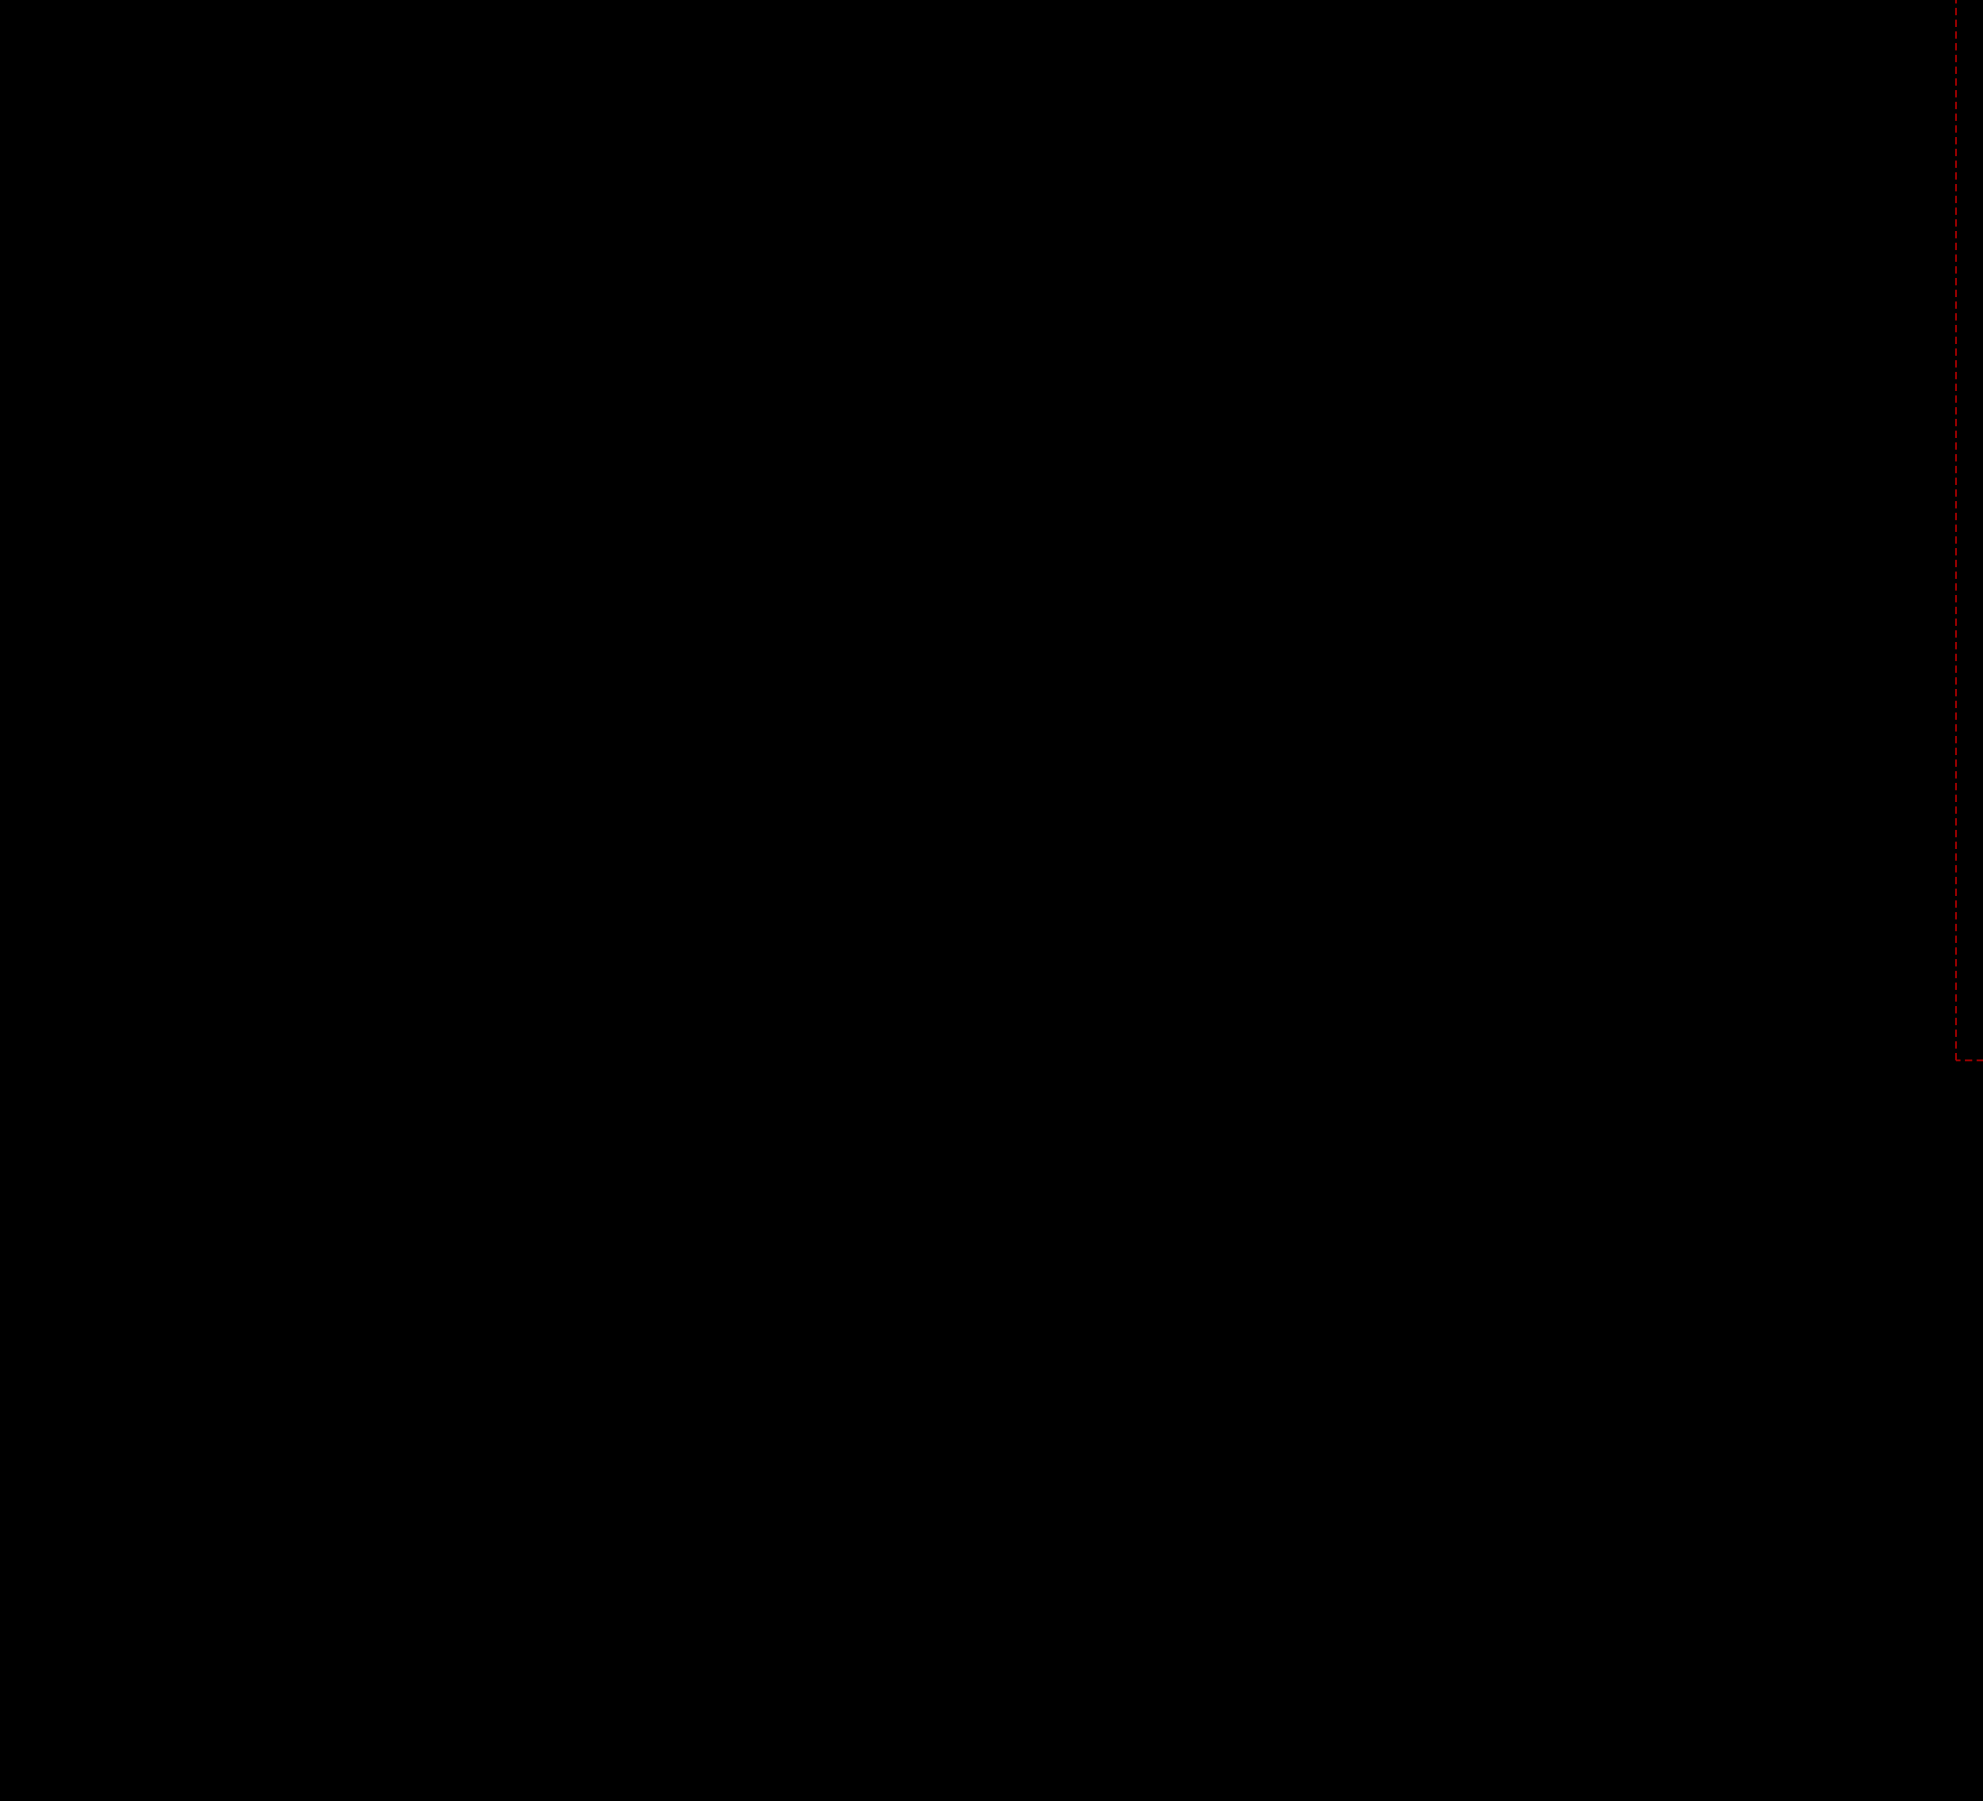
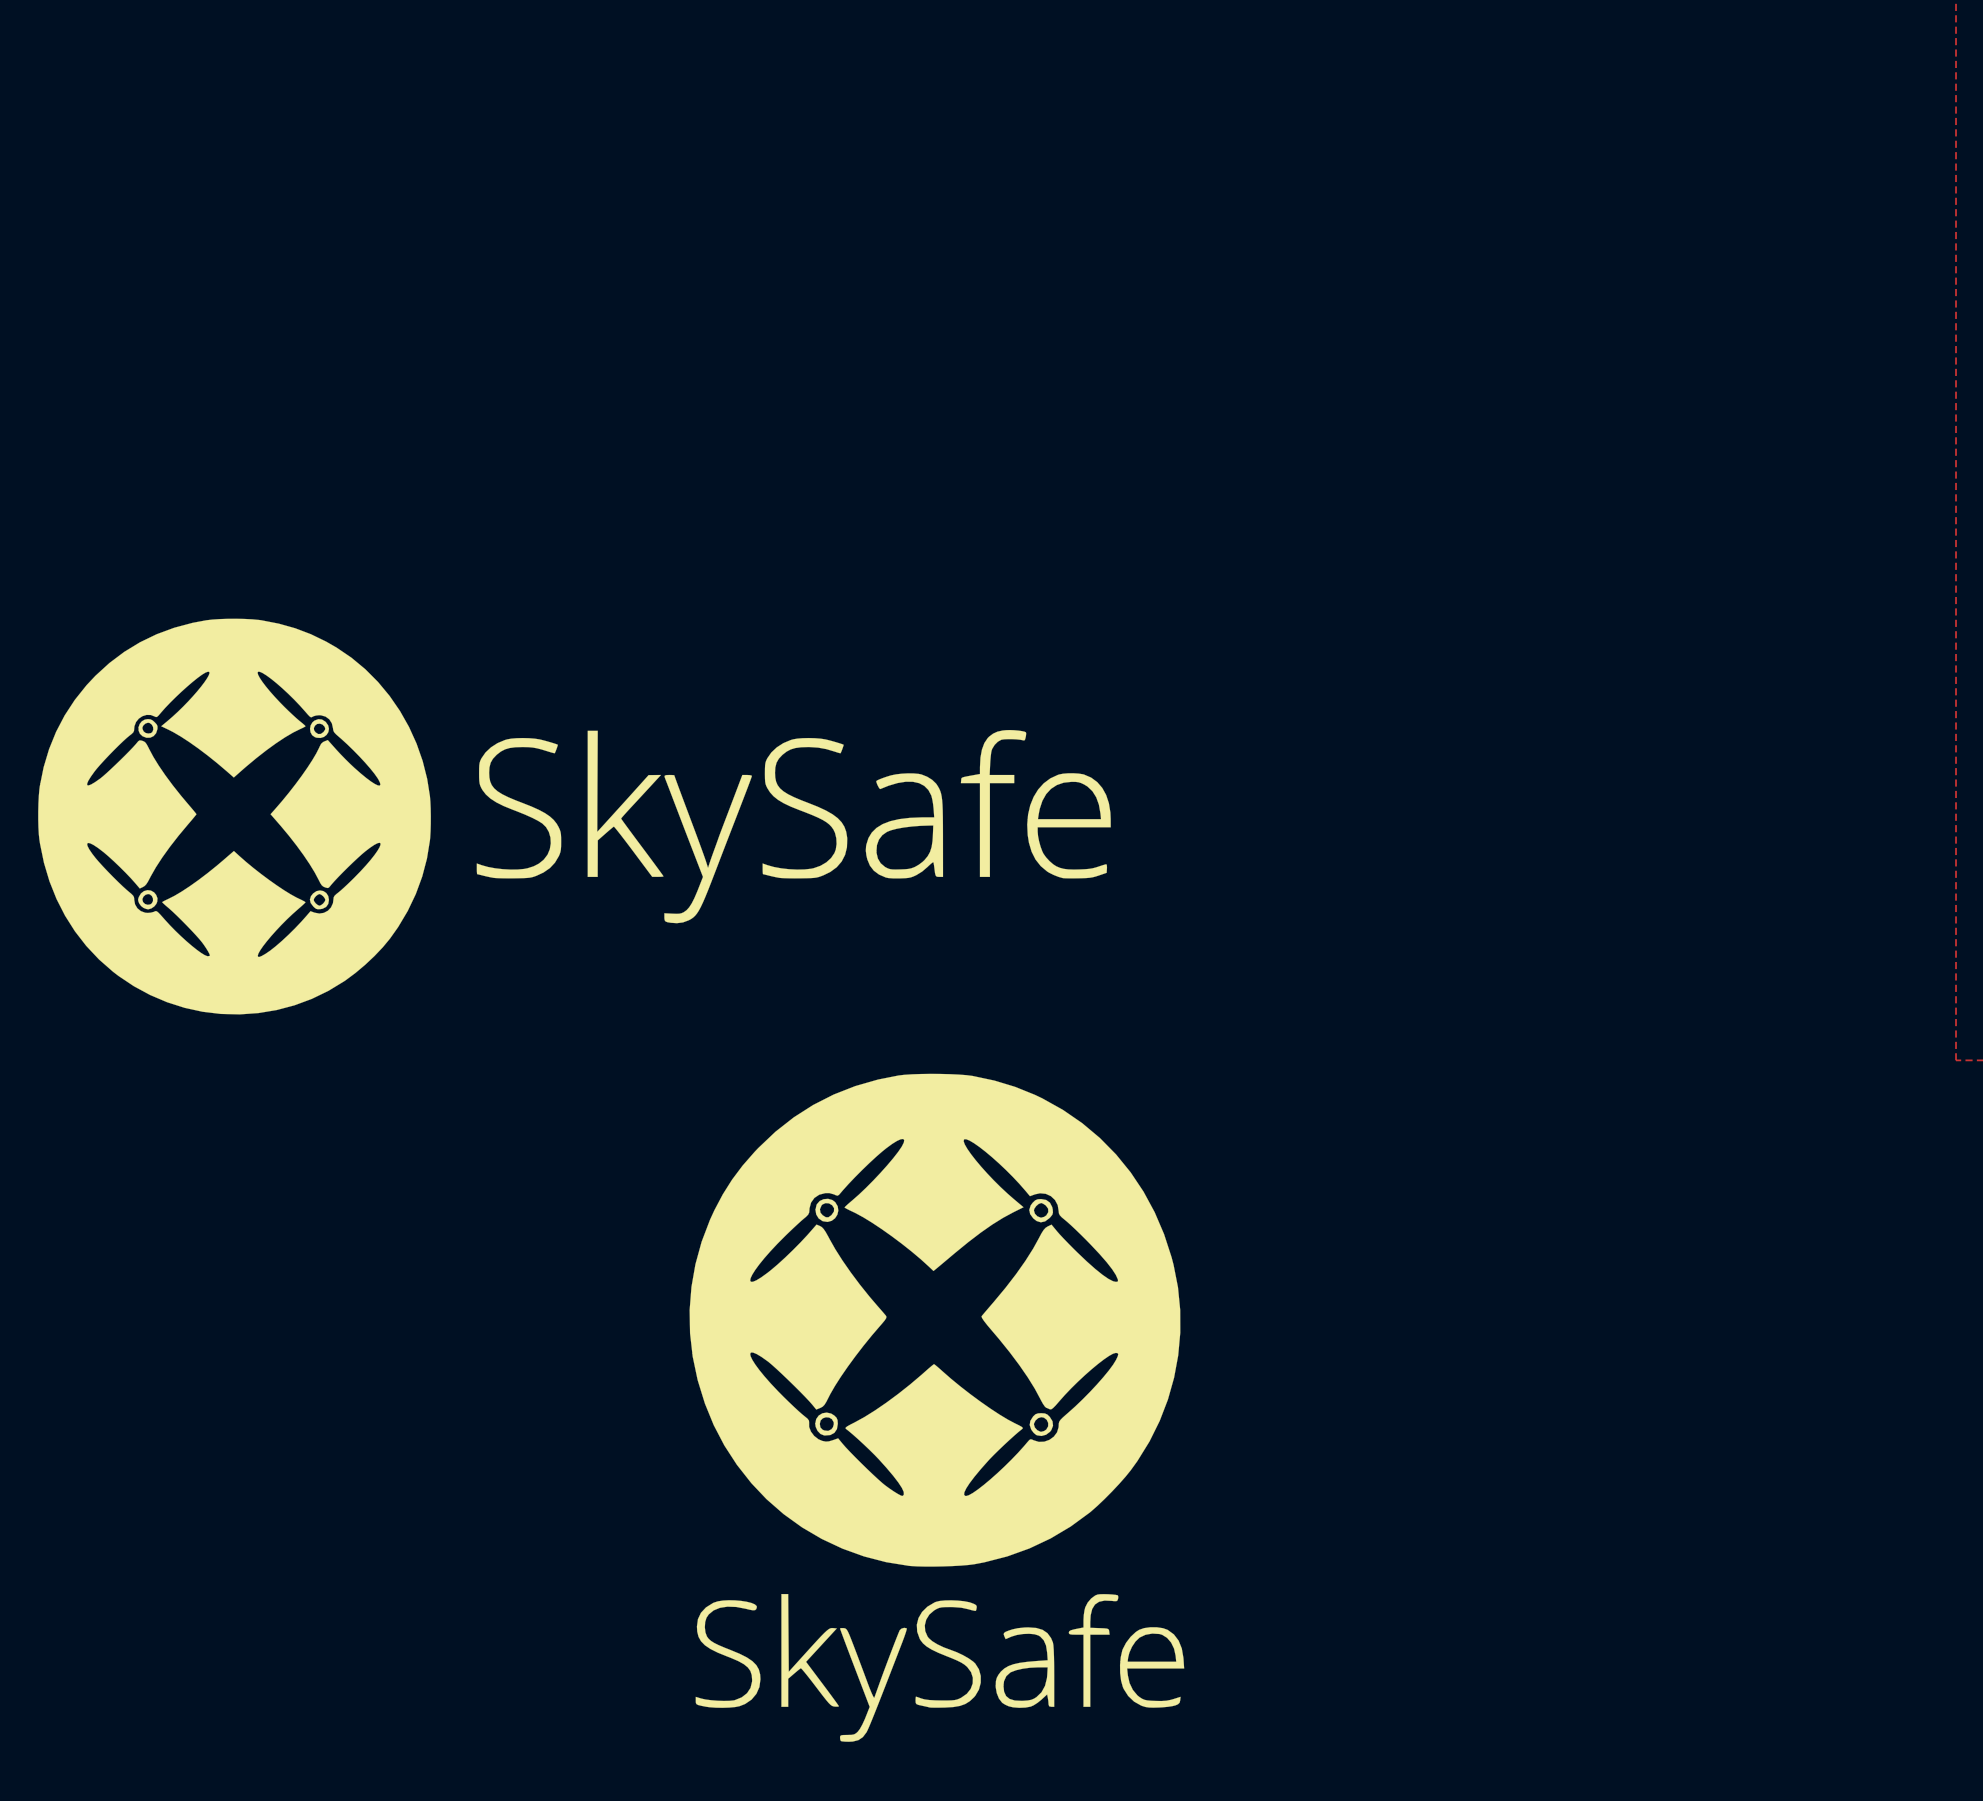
drawing: none -> [38, 618, 1111, 1015]
drawing: none -> [689, 1073, 1185, 1742]

